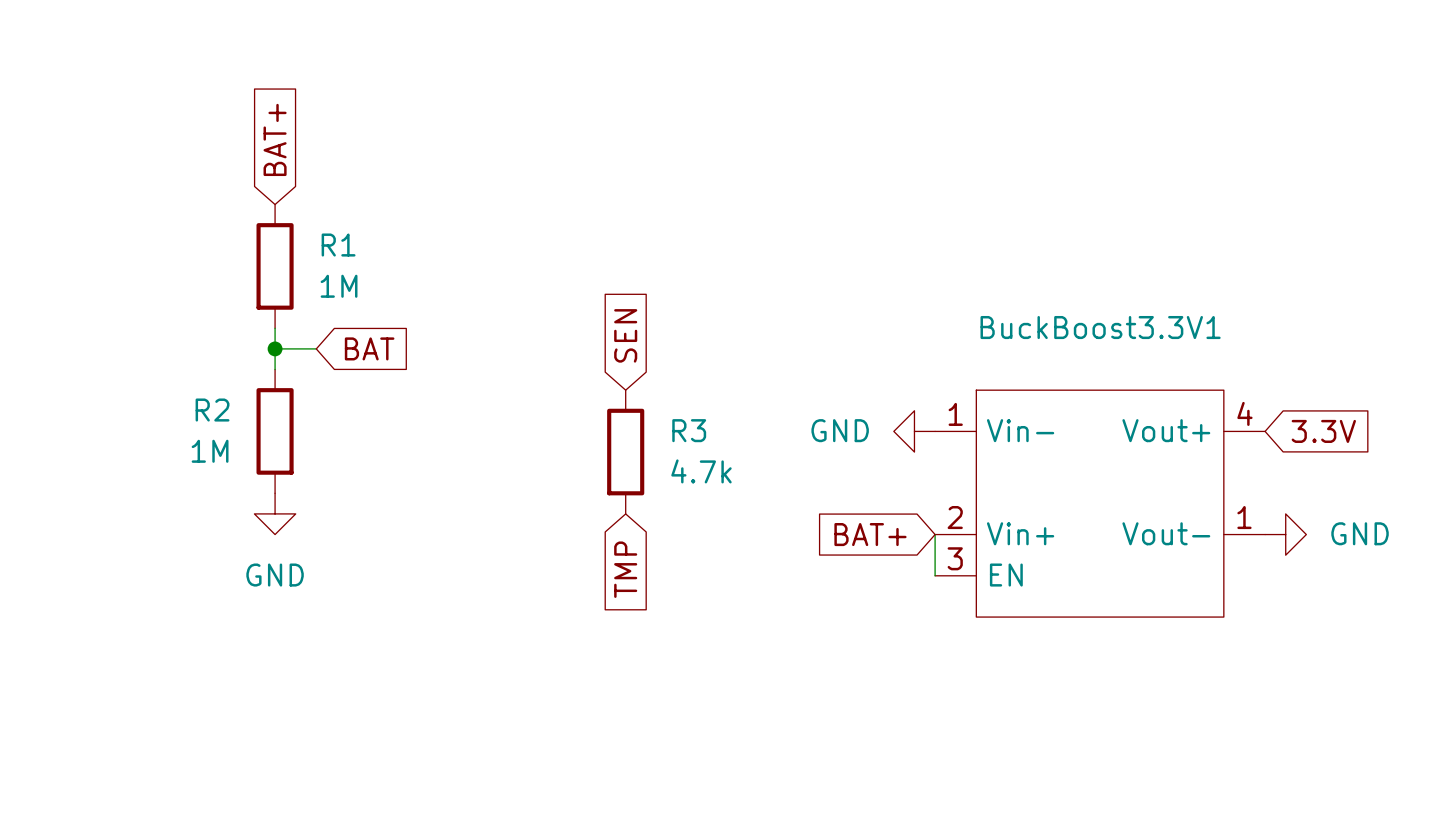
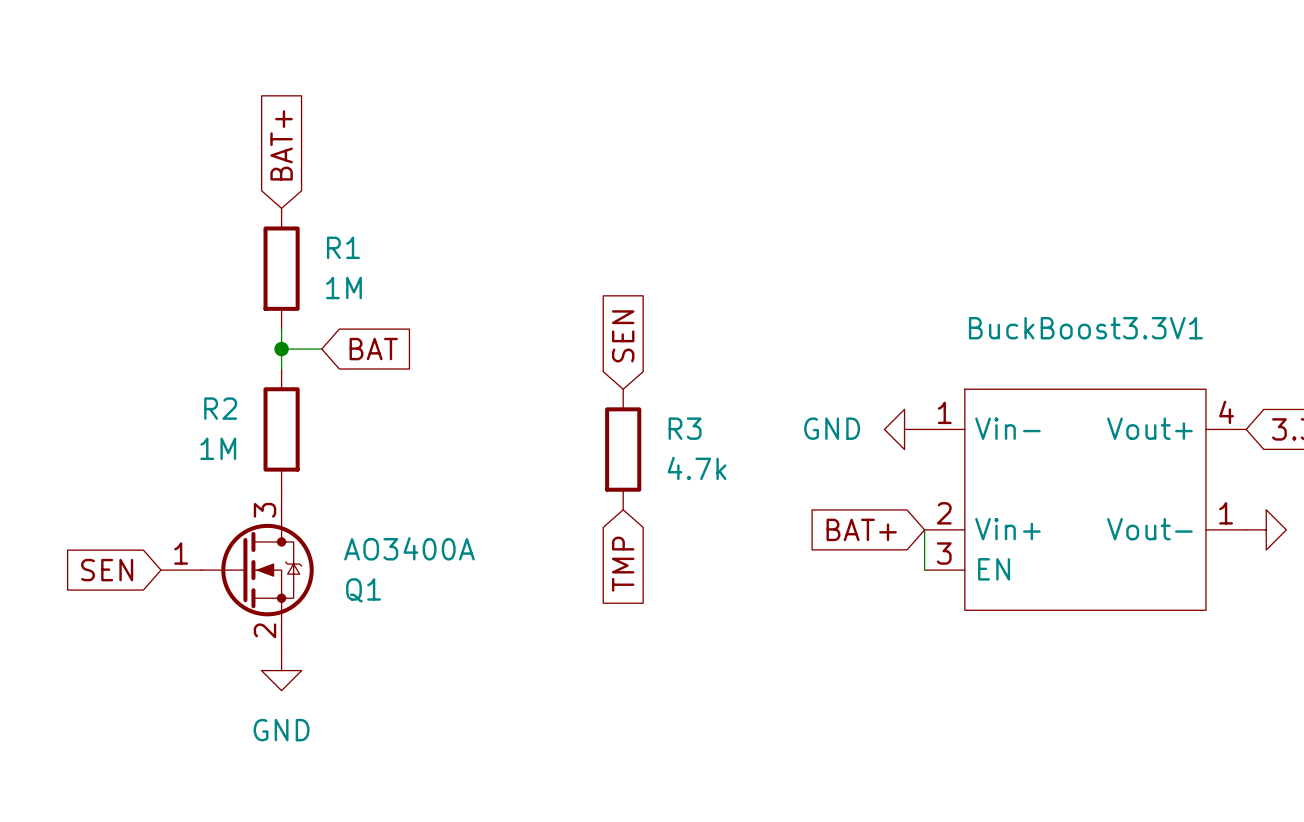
power symbol position: GND (275, 513) -> GND (281, 670)
global label: none -> SEN (107, 570)
Q1: none -> AO3400A (237, 570)

